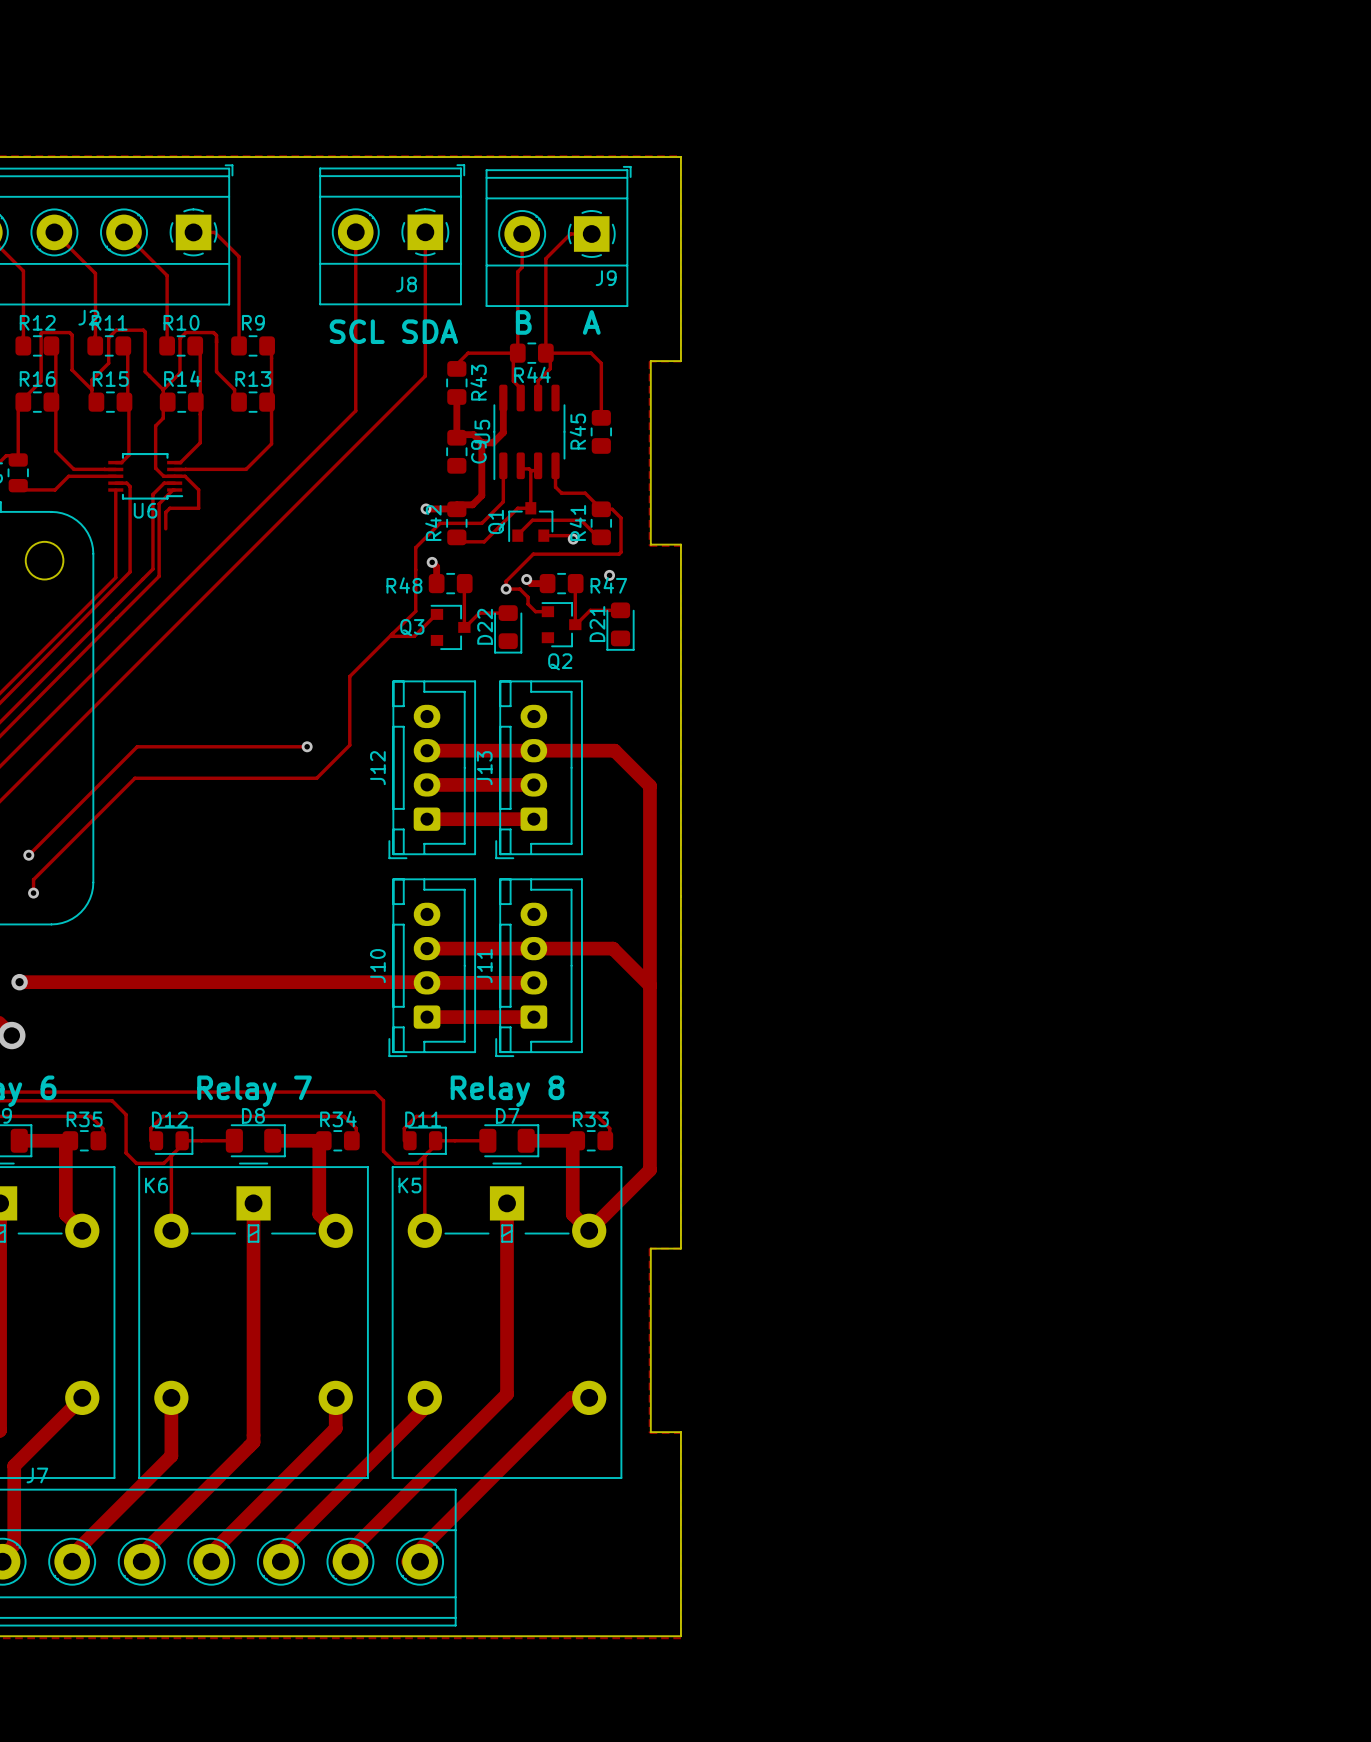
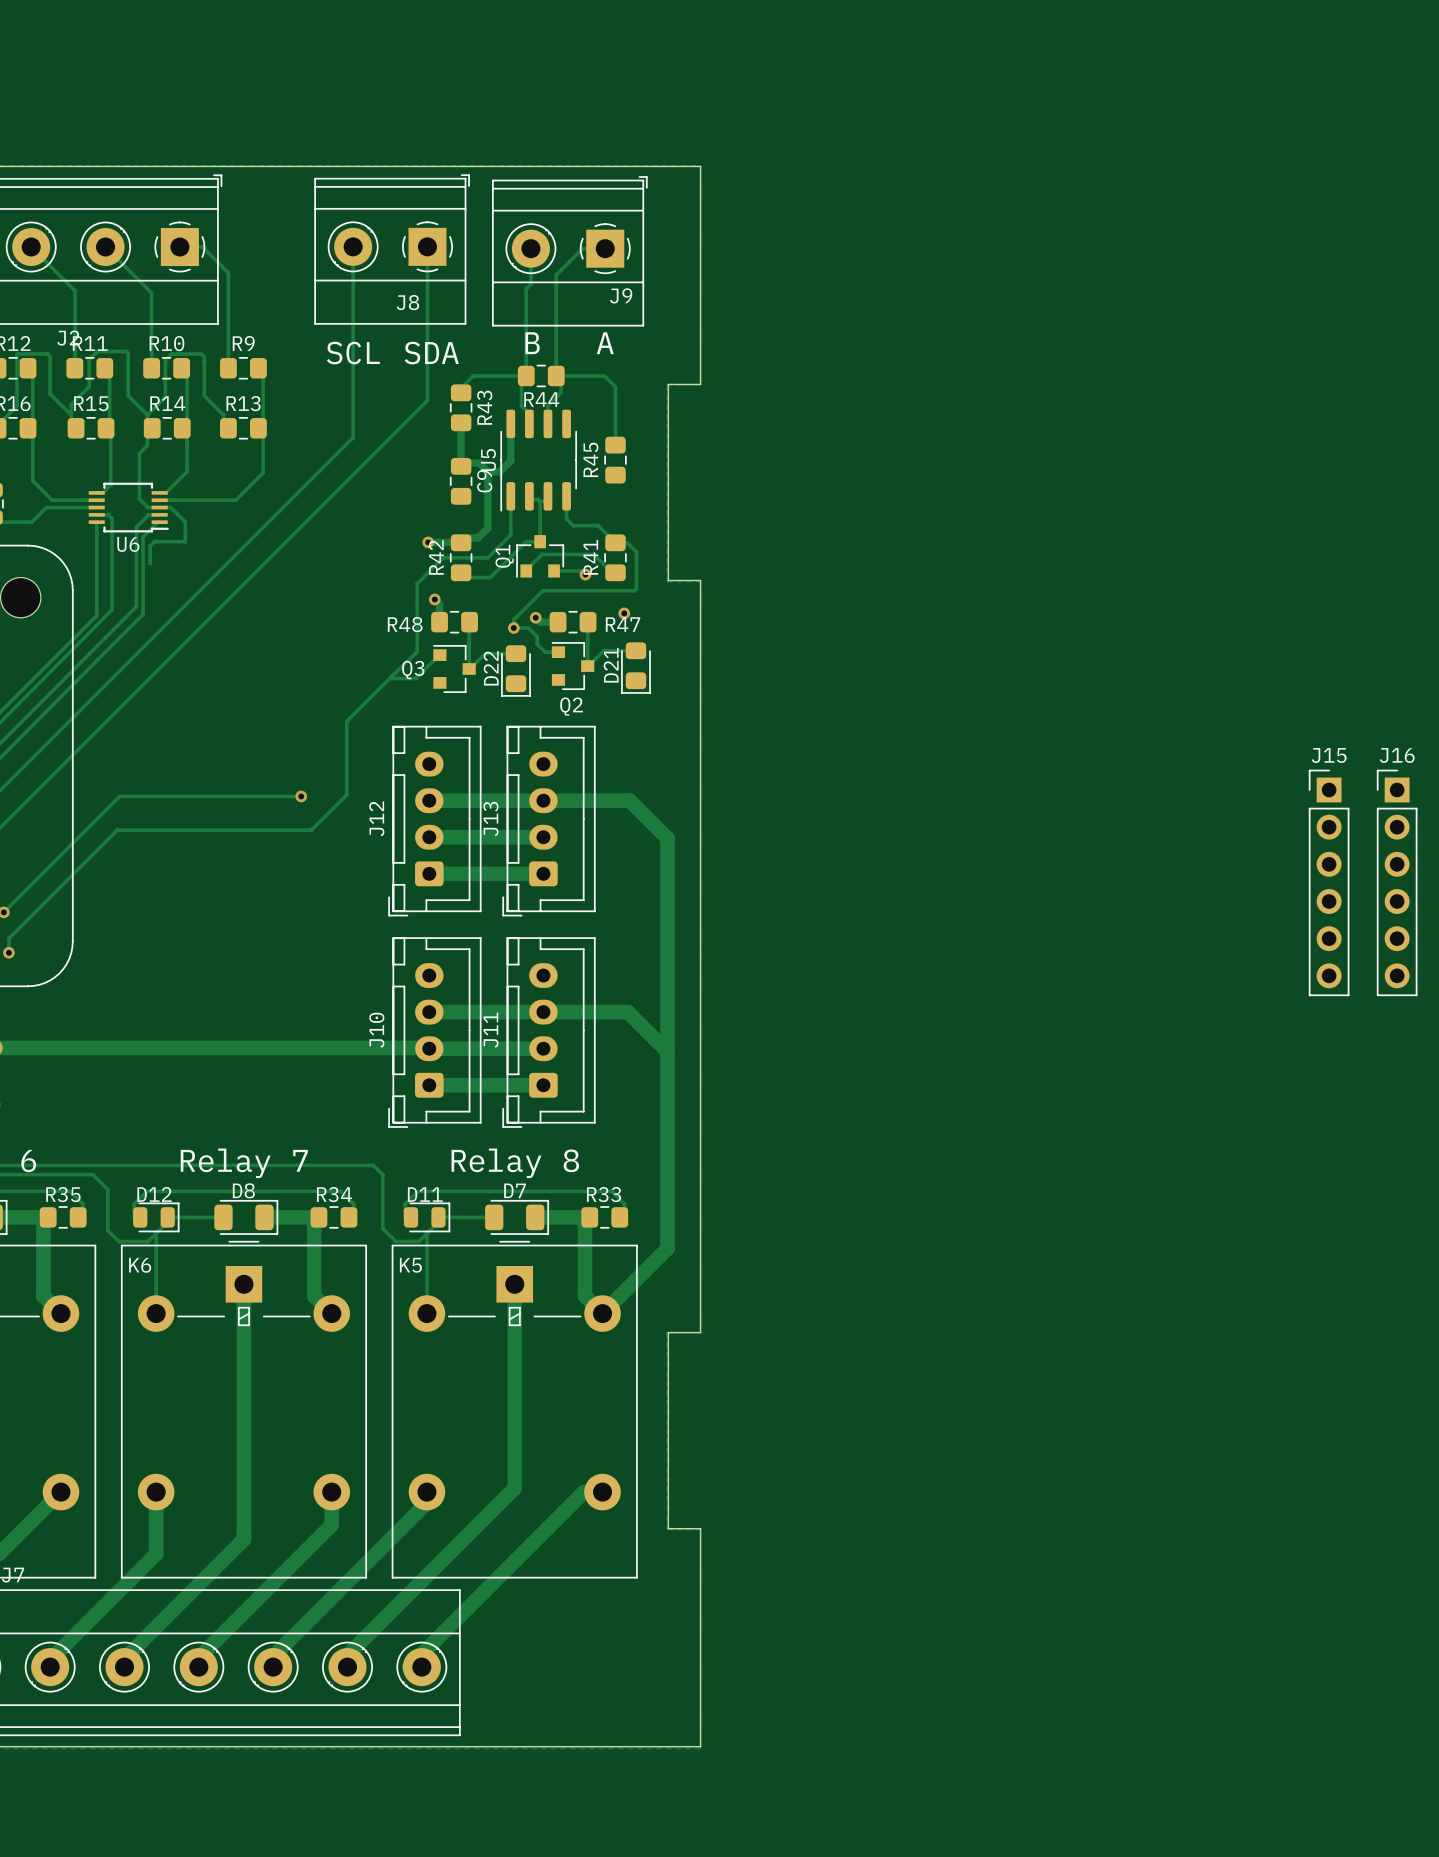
J15: none -> (1329, 882)
J16: none -> (1397, 882)

